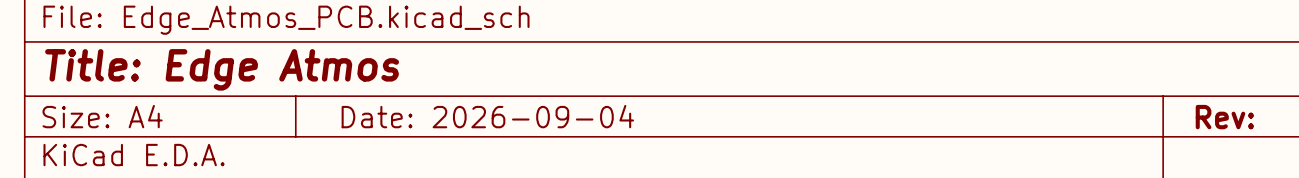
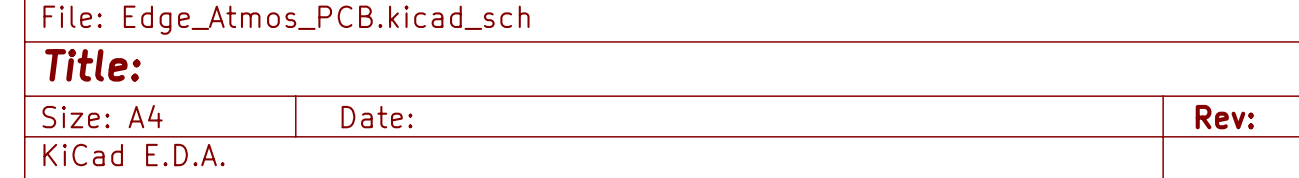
title block: Title: Edge Atmos (222, 69) -> Title: (92, 65)
title block: Date: 2026-09-04 (487, 116) -> Date: (377, 117)

